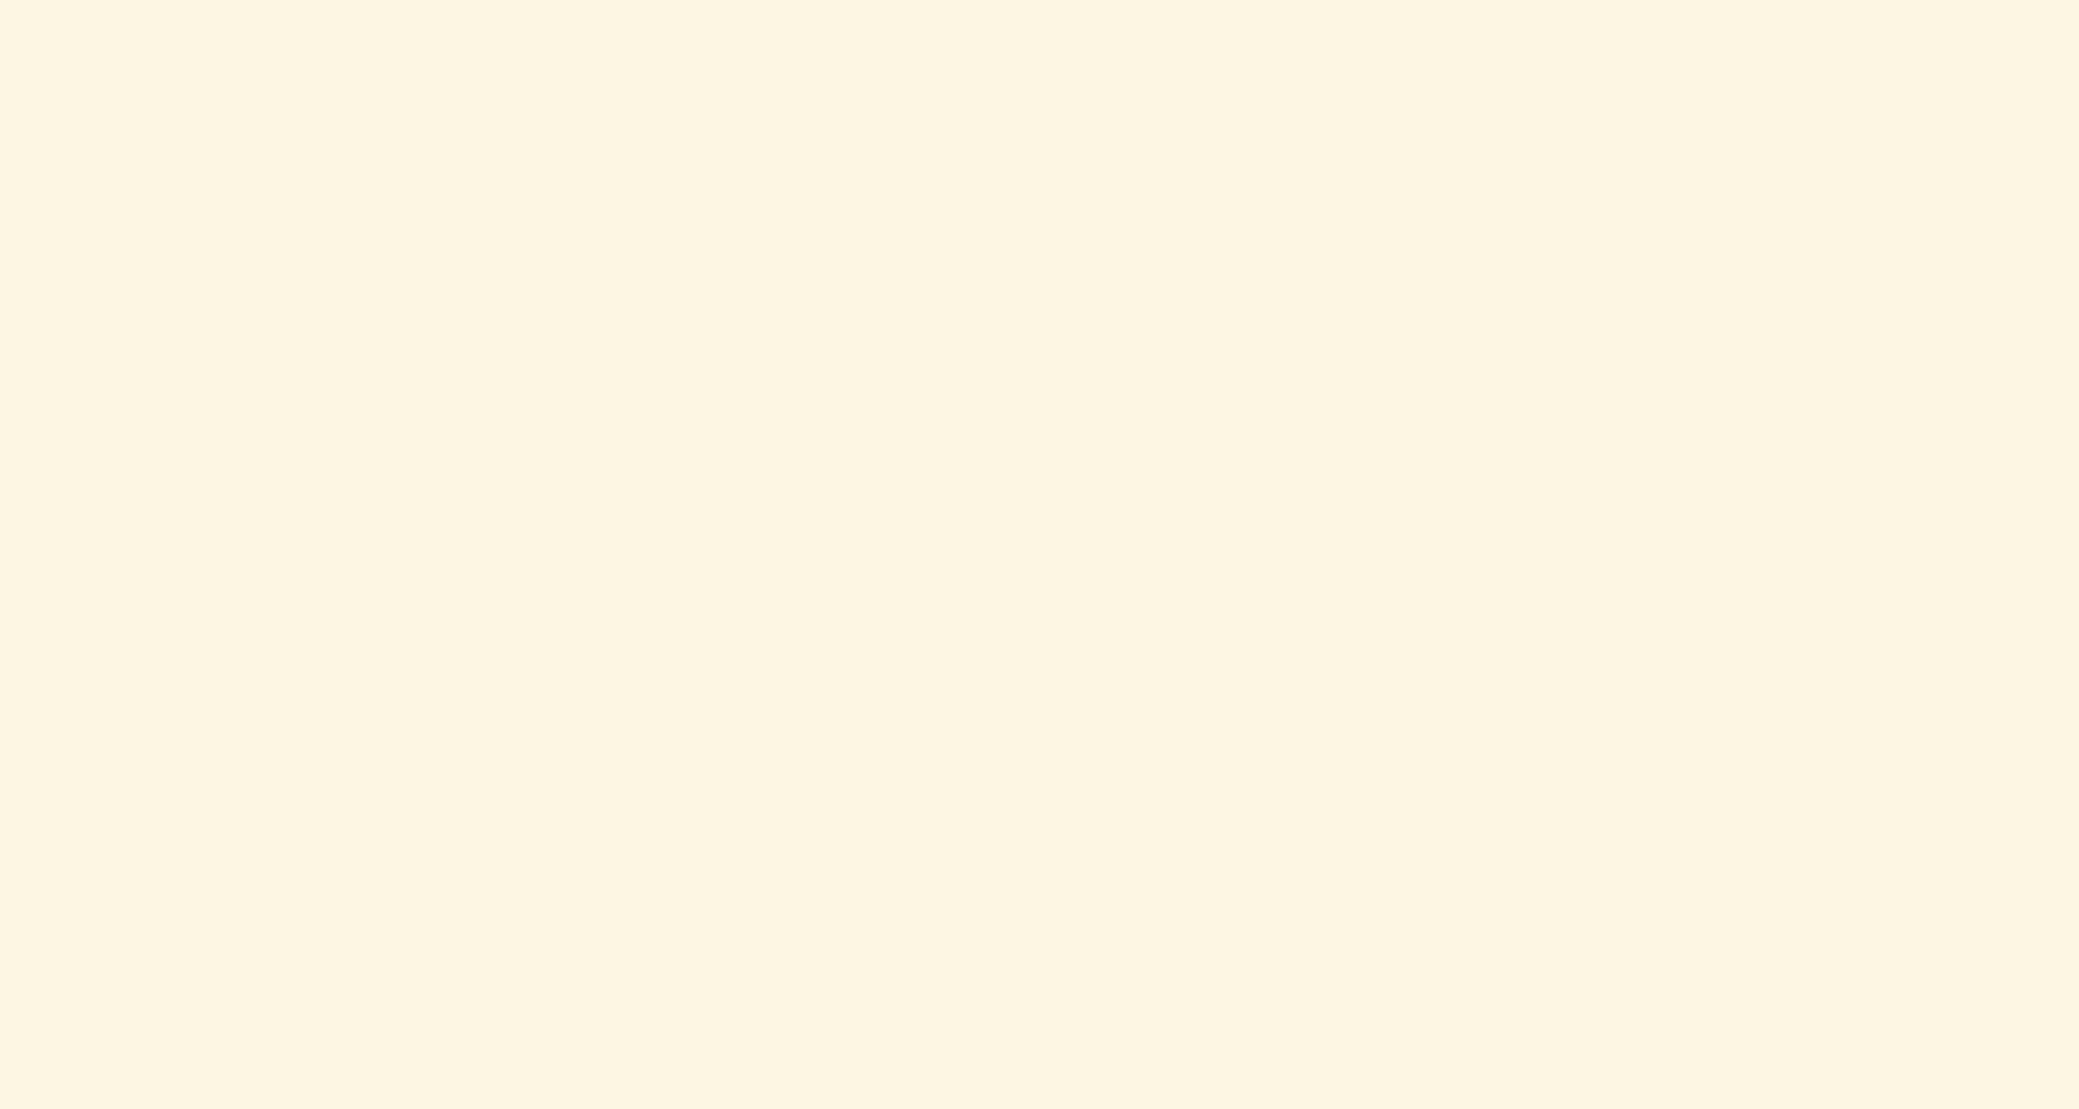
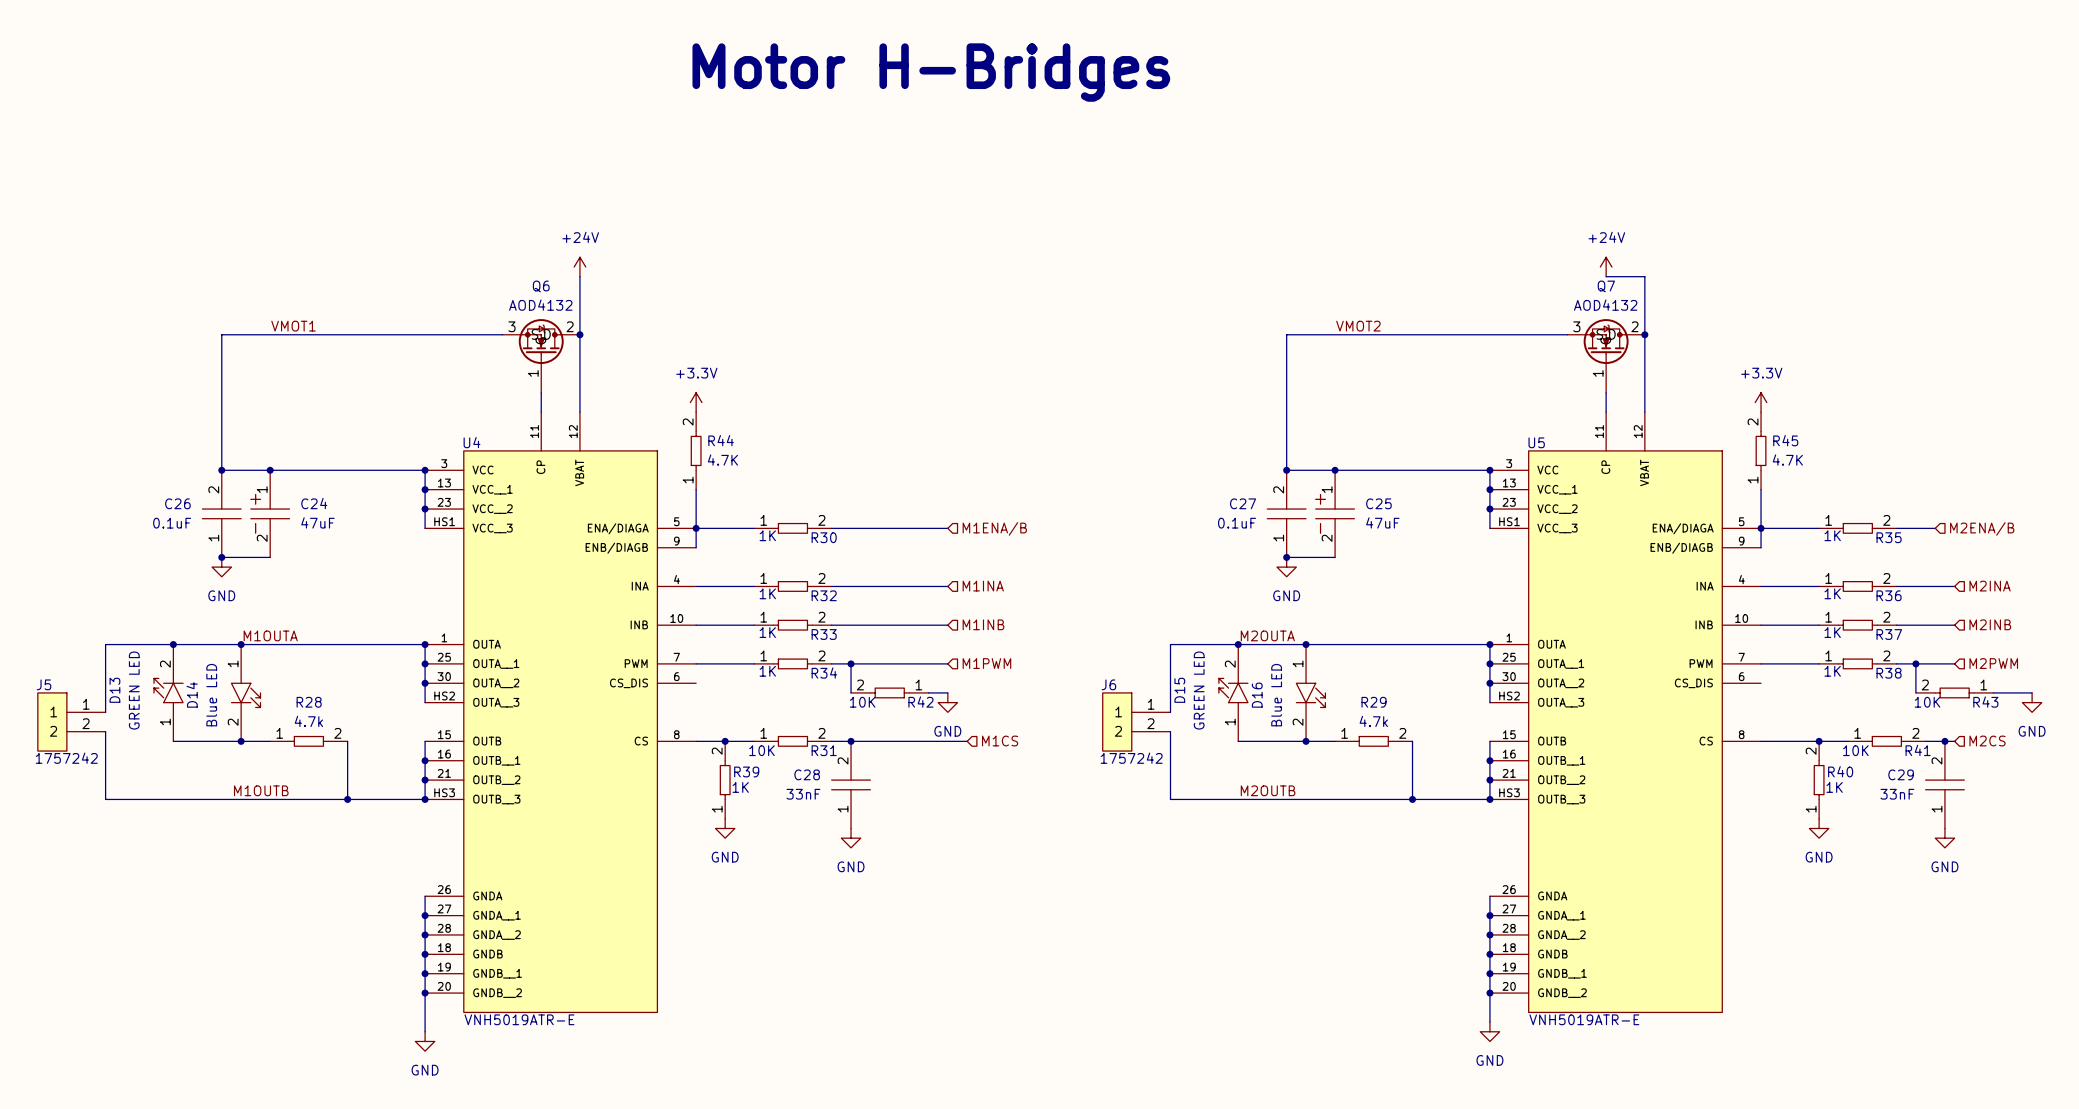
text: none -> Motor H-Bridges (931, 72)
power symbol: none -> +24V (579, 267)
power symbol: none -> +24V (1606, 267)
wire: none -> (579, 276) (579, 412)
wire: none -> (1606, 276) (1644, 276) (1644, 412)
label: none -> VMOT1 (293, 326)
label: none -> VMOT2 (1358, 326)
wire: none -> (502, 334) (221, 334) (221, 470) (425, 470) (425, 528)
junction: none -> (579, 334)
wire: none -> (1567, 334) (1286, 334) (1286, 470) (1489, 470) (1489, 528)
junction: none -> (1644, 334)
Q6: none -> (541, 355)
Q7: none -> (1606, 355)
wire: none -> (541, 392) (541, 412)
wire: none -> (1606, 392) (1606, 412)
power symbol: none -> +3.3V (696, 402)
power symbol: none -> +3.3V (1761, 402)
R44: none -> (696, 450)
R45: none -> (1761, 450)
junction: none -> (221, 470)
junction: none -> (270, 470)
junction: none -> (425, 470)
junction: none -> (1286, 470)
junction: none -> (1335, 470)
junction: none -> (1489, 470)
junction: none -> (425, 489)
wire: none -> (696, 489) (696, 547)
junction: none -> (1489, 489)
wire: none -> (1761, 489) (1761, 547)
junction: none -> (425, 509)
junction: none -> (1489, 509)
C26: none -> (221, 513)
C24: none -> (270, 513)
C27: none -> (1286, 513)
C25: none -> (1335, 513)
hierarchical label: none -> M1ENA/B (994, 528)
hierarchical label: none -> M2ENA/B (1982, 528)
wire: none -> (696, 528) (754, 528)
junction: none -> (696, 528)
R30: none -> (792, 528)
wire: none -> (831, 528) (947, 528)
wire: none -> (1761, 528) (1819, 528)
junction: none -> (1761, 528)
R35: none -> (1857, 528)
wire: none -> (1896, 528) (1935, 528)
wire: none -> (221, 557) (270, 557)
junction: none -> (221, 557)
wire: none -> (1286, 557) (1335, 557)
junction: none -> (1286, 557)
power symbol: none -> GND (221, 567)
power symbol: none -> GND (1286, 567)
wire: none -> (696, 586) (754, 586)
R32: none -> (792, 586)
wire: none -> (831, 586) (947, 586)
hierarchical label: none -> M1INA (983, 586)
wire: none -> (1761, 586) (1819, 586)
R36: none -> (1857, 586)
wire: none -> (1896, 586) (1954, 586)
hierarchical label: none -> M2INA (1990, 586)
hierarchical label: none -> M1INB (983, 624)
hierarchical label: none -> M2INB (1990, 624)
wire: none -> (696, 625) (754, 625)
R33: none -> (792, 625)
wire: none -> (831, 625) (947, 625)
wire: none -> (1761, 625) (1819, 625)
R37: none -> (1857, 625)
wire: none -> (1896, 625) (1954, 625)
label: none -> M1OUTA (270, 635)
label: none -> M2OUTA (1267, 635)
junction: none -> (173, 644)
junction: none -> (241, 644)
junction: none -> (425, 644)
junction: none -> (1238, 644)
junction: none -> (1306, 644)
junction: none -> (1489, 644)
junction: none -> (425, 663)
wire: none -> (696, 663) (754, 663)
R34: none -> (792, 663)
wire: none -> (831, 663) (947, 663)
wire: none -> (851, 663) (851, 692)
junction: none -> (851, 663)
hierarchical label: none -> M1PWM (986, 663)
junction: none -> (1489, 663)
wire: none -> (1761, 663) (1819, 663)
R38: none -> (1857, 663)
wire: none -> (1896, 663) (1954, 663)
wire: none -> (1915, 663) (1915, 692)
junction: none -> (1915, 663)
hierarchical label: none -> M2PWM (1993, 663)
junction: none -> (425, 683)
junction: none -> (1489, 683)
D13: none -> (168, 692)
D14: none -> (245, 692)
R42: none -> (889, 692)
wire: none -> (928, 692) (947, 692)
D15: none -> (1233, 692)
D16: none -> (1310, 692)
R43: none -> (1954, 692)
wire: none -> (1993, 692) (2032, 692)
wire: none -> (425, 702) (425, 644) (105, 644) (105, 712)
power symbol: none -> GND (947, 702)
wire: none -> (1489, 702) (1489, 644) (1170, 644) (1170, 712)
power symbol: none -> GND (2032, 702)
U4: none -> (560, 712)
U5: none -> (1625, 712)
J5: none -> 1757242 (71, 722)
J6: none -> 1757242 (1136, 722)
wire: none -> (105, 731) (105, 799) (425, 799) (425, 741)
wire: none -> (1170, 731) (1170, 799) (1489, 799) (1489, 741)
hierarchical label: none -> M1CS (1000, 741)
hierarchical label: none -> M2CS (1987, 741)
wire: none -> (173, 741) (270, 741)
junction: none -> (241, 741)
R28: none -> (308, 741)
wire: none -> (347, 741) (347, 799)
wire: none -> (696, 741) (754, 741)
junction: none -> (725, 741)
R31: none -> (792, 741)
wire: none -> (831, 741) (967, 741)
junction: none -> (851, 741)
wire: none -> (1238, 741) (1335, 741)
junction: none -> (1306, 741)
R29: none -> (1373, 741)
wire: none -> (1412, 741) (1412, 799)
wire: none -> (1761, 741) (1848, 741)
junction: none -> (1819, 741)
R41: none -> (1886, 741)
wire: none -> (1925, 741) (1954, 741)
junction: none -> (1944, 741)
junction: none -> (425, 760)
junction: none -> (1489, 760)
junction: none -> (425, 780)
R39: none -> (725, 780)
junction: none -> (1489, 780)
R40: none -> (1819, 780)
C28: none -> (851, 784)
C29: none -> (1944, 784)
label: none -> M1OUTB (261, 790)
label: none -> M2OUTB (1268, 790)
junction: none -> (347, 799)
junction: none -> (425, 799)
junction: none -> (1412, 799)
junction: none -> (1489, 799)
power symbol: none -> GND (725, 828)
power symbol: none -> GND (1819, 828)
power symbol: none -> GND (851, 838)
power symbol: none -> GND (1944, 838)
wire: none -> (425, 896) (425, 1031)
wire: none -> (1489, 896) (1489, 1022)
junction: none -> (425, 915)
junction: none -> (1489, 915)
junction: none -> (425, 934)
junction: none -> (1489, 934)
junction: none -> (425, 954)
junction: none -> (1489, 954)
junction: none -> (425, 973)
junction: none -> (1489, 973)
junction: none -> (425, 993)
junction: none -> (1489, 993)
power symbol: none -> GND (1489, 1031)
power symbol: none -> GND (425, 1041)

